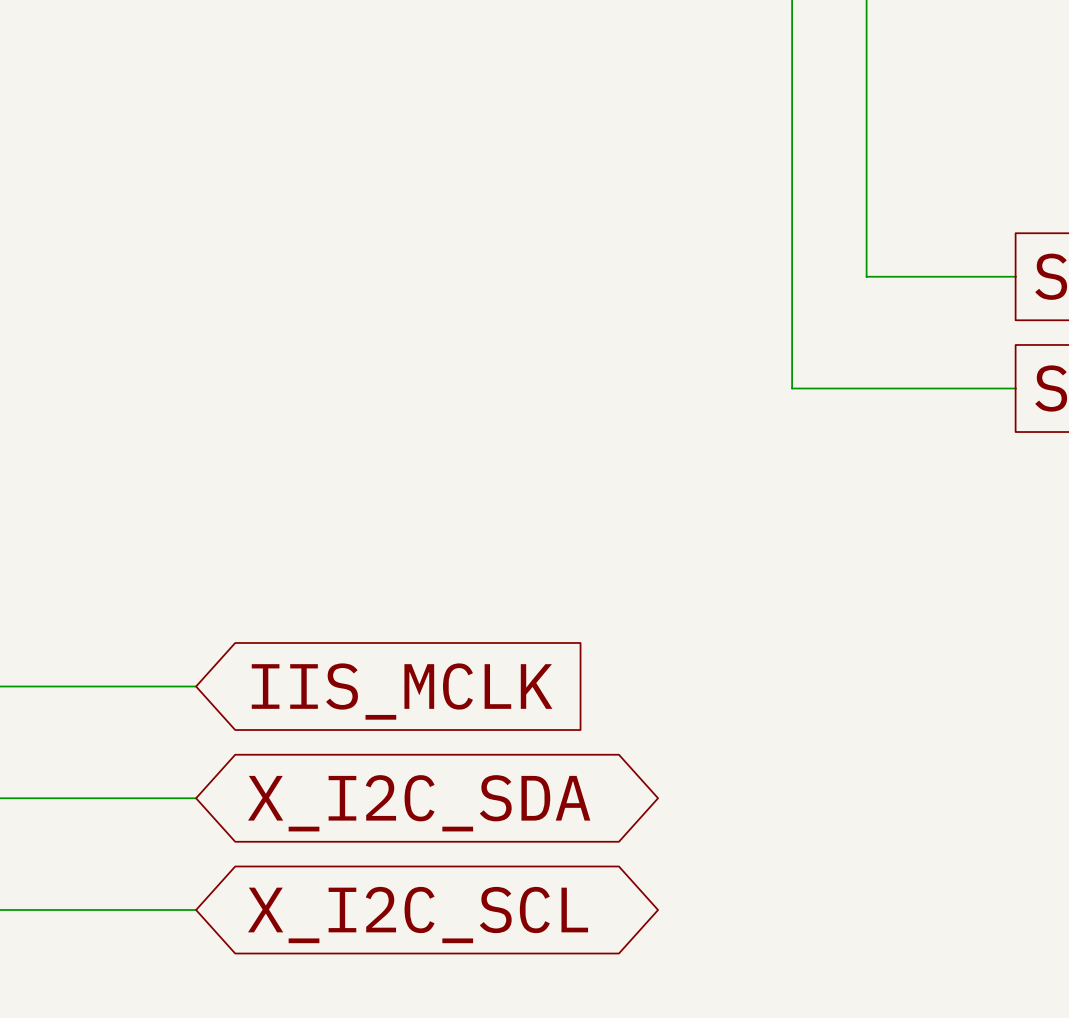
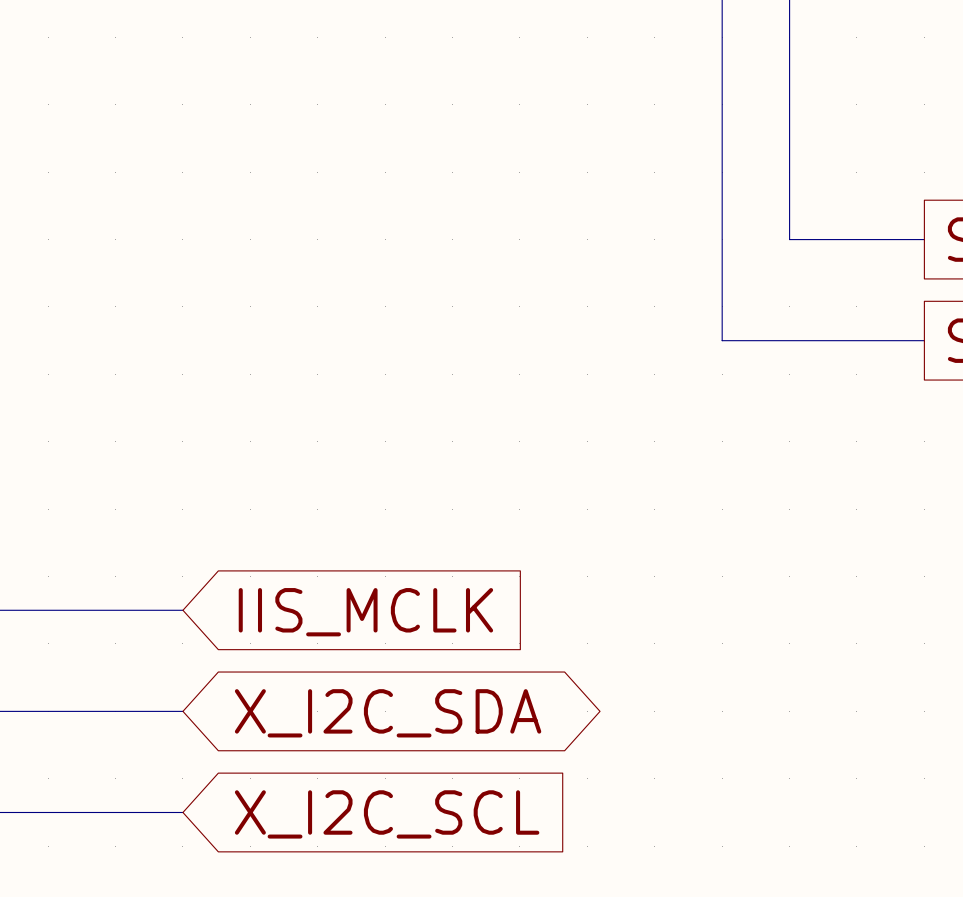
global label shape: bidirectional (418, 915) -> input (387, 814)

